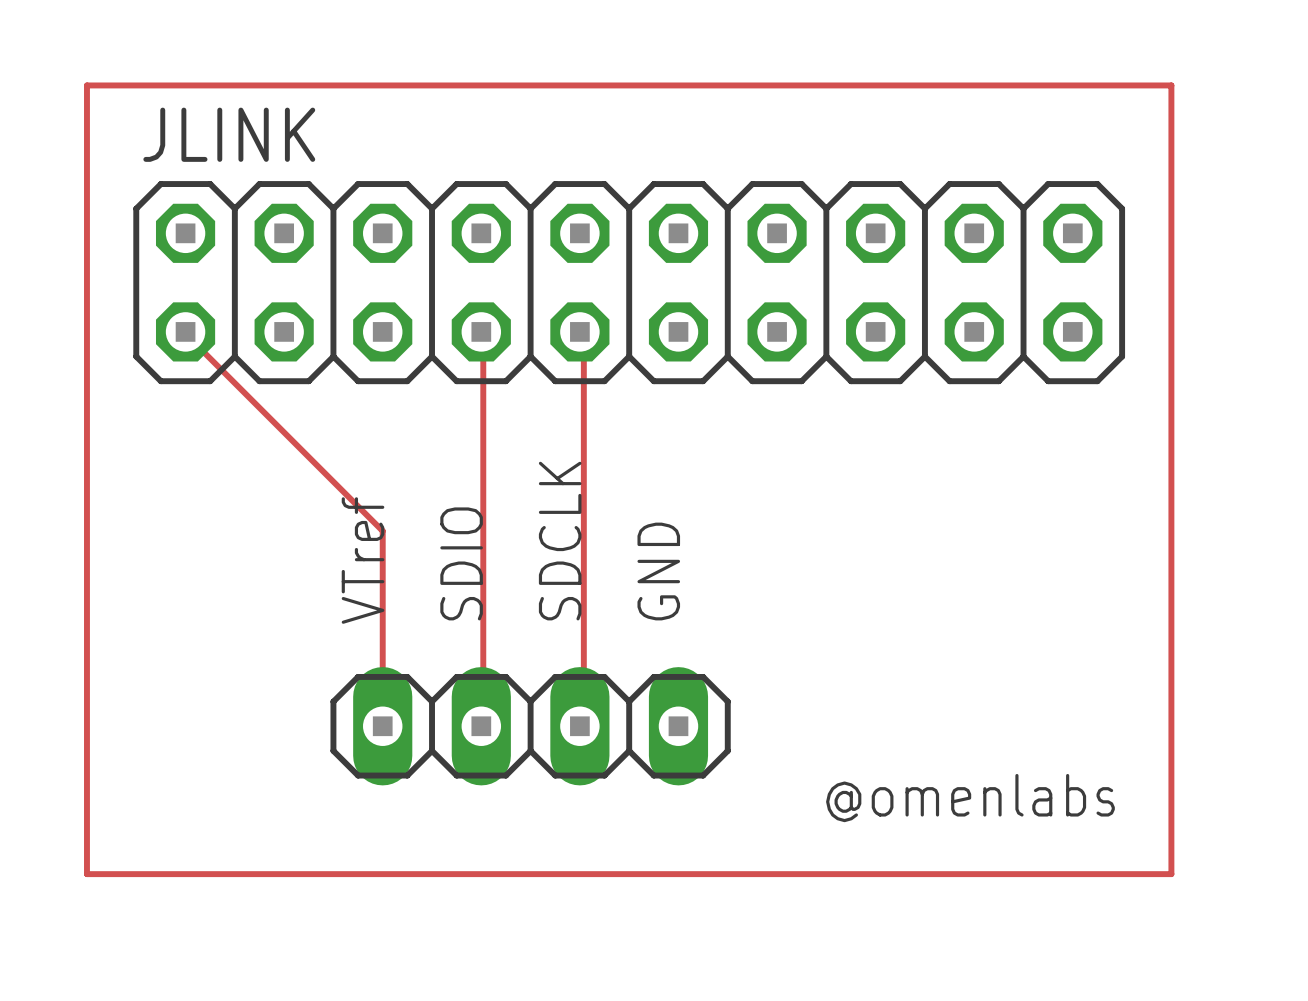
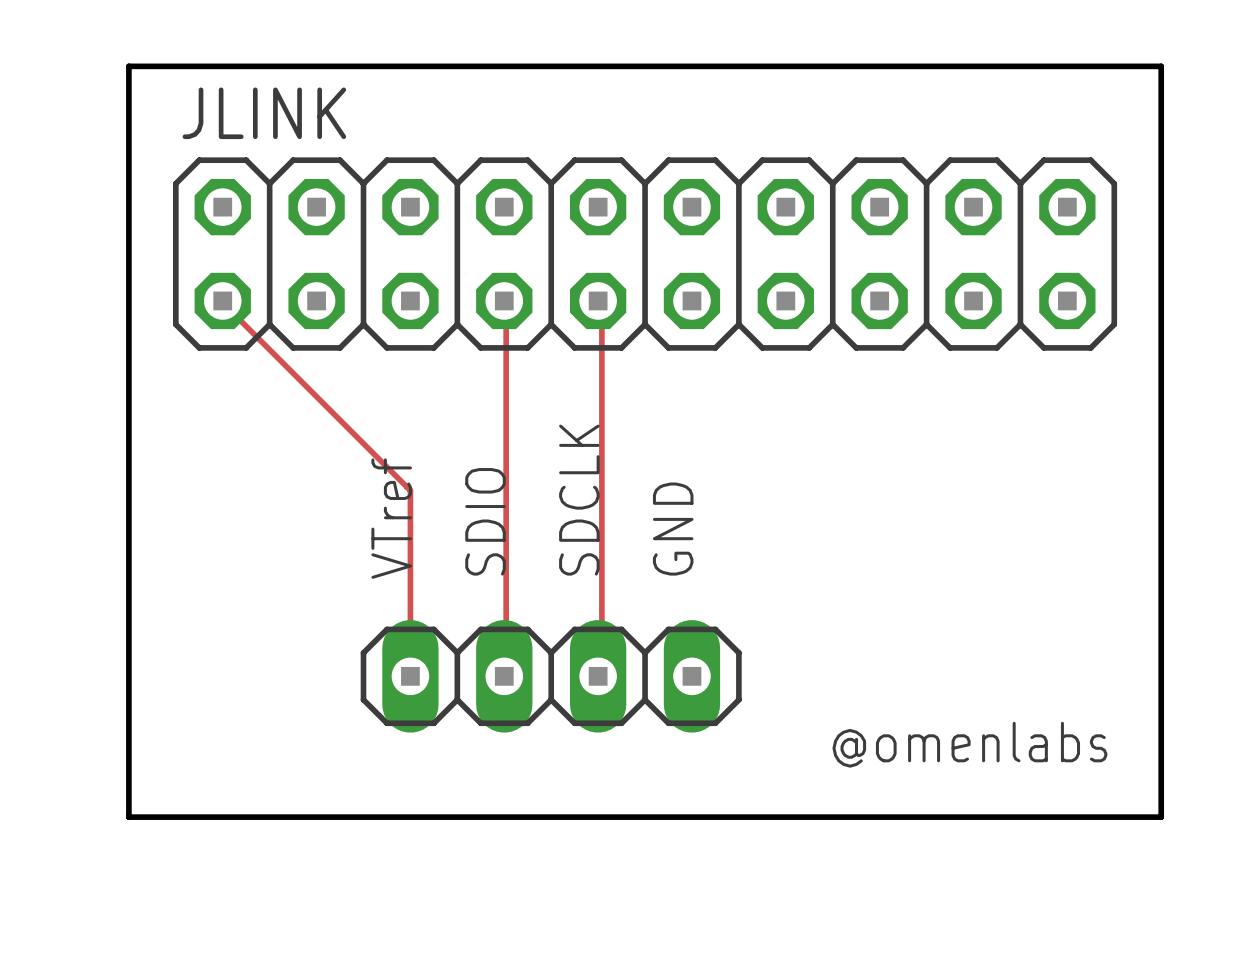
track: (86, 85) (1171, 85) (1171, 874) (86, 874) (86, 85) -> none
board edge: none -> (128, 66) (128, 817) (1161, 817) (1161, 66) (128, 66)

